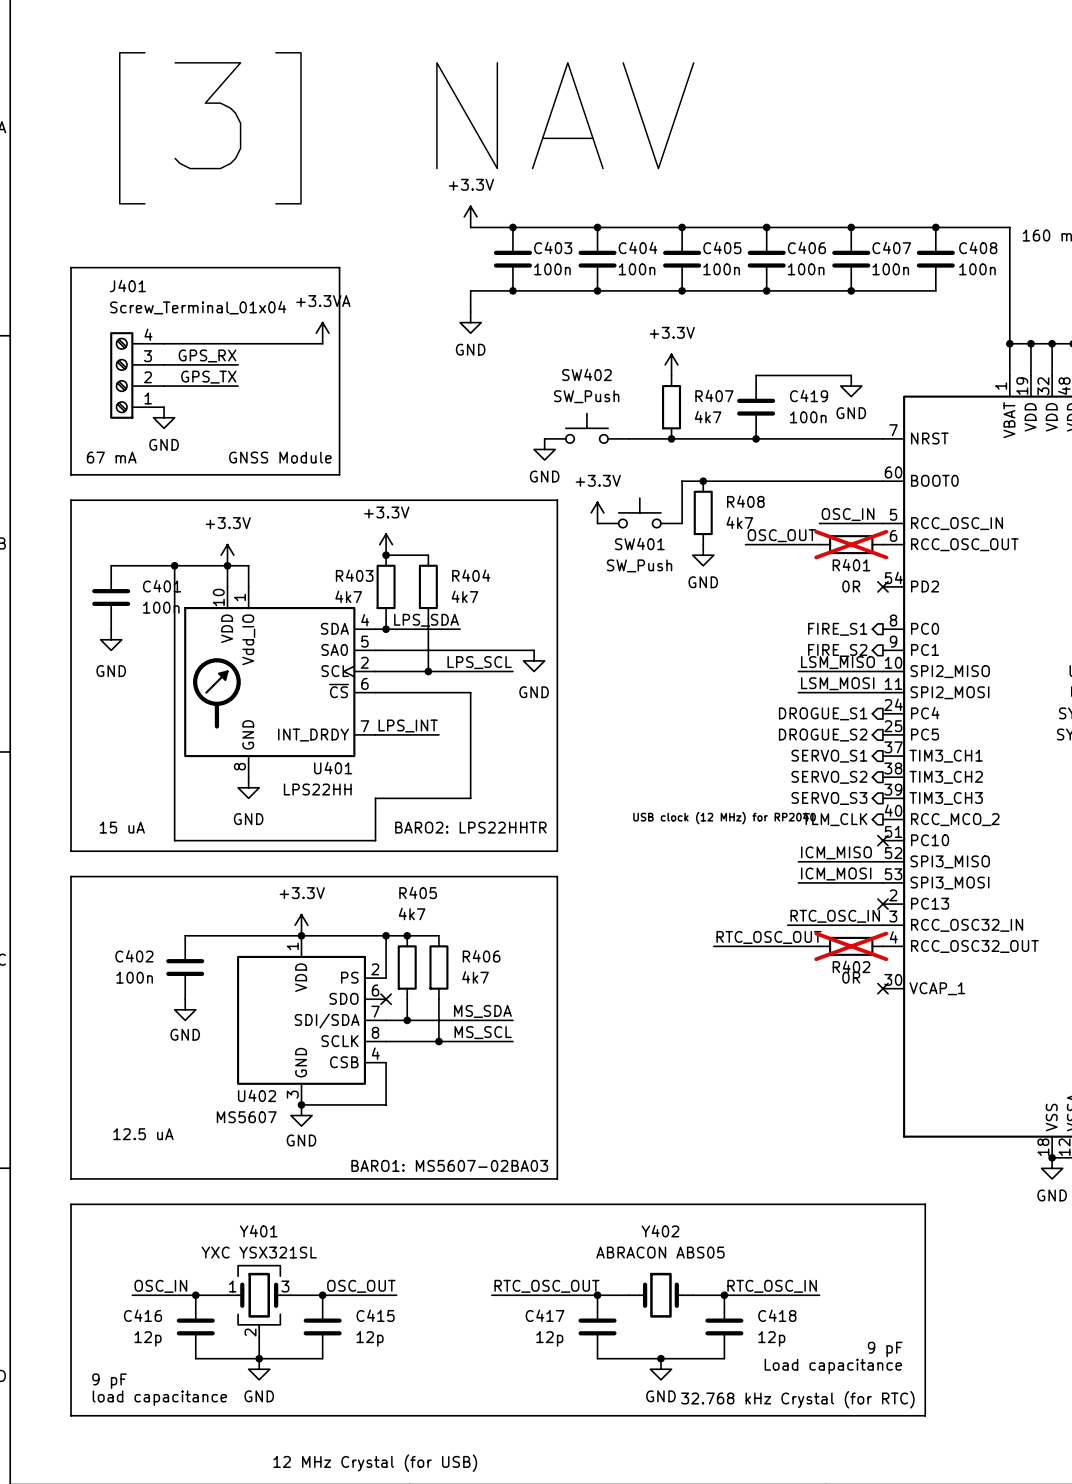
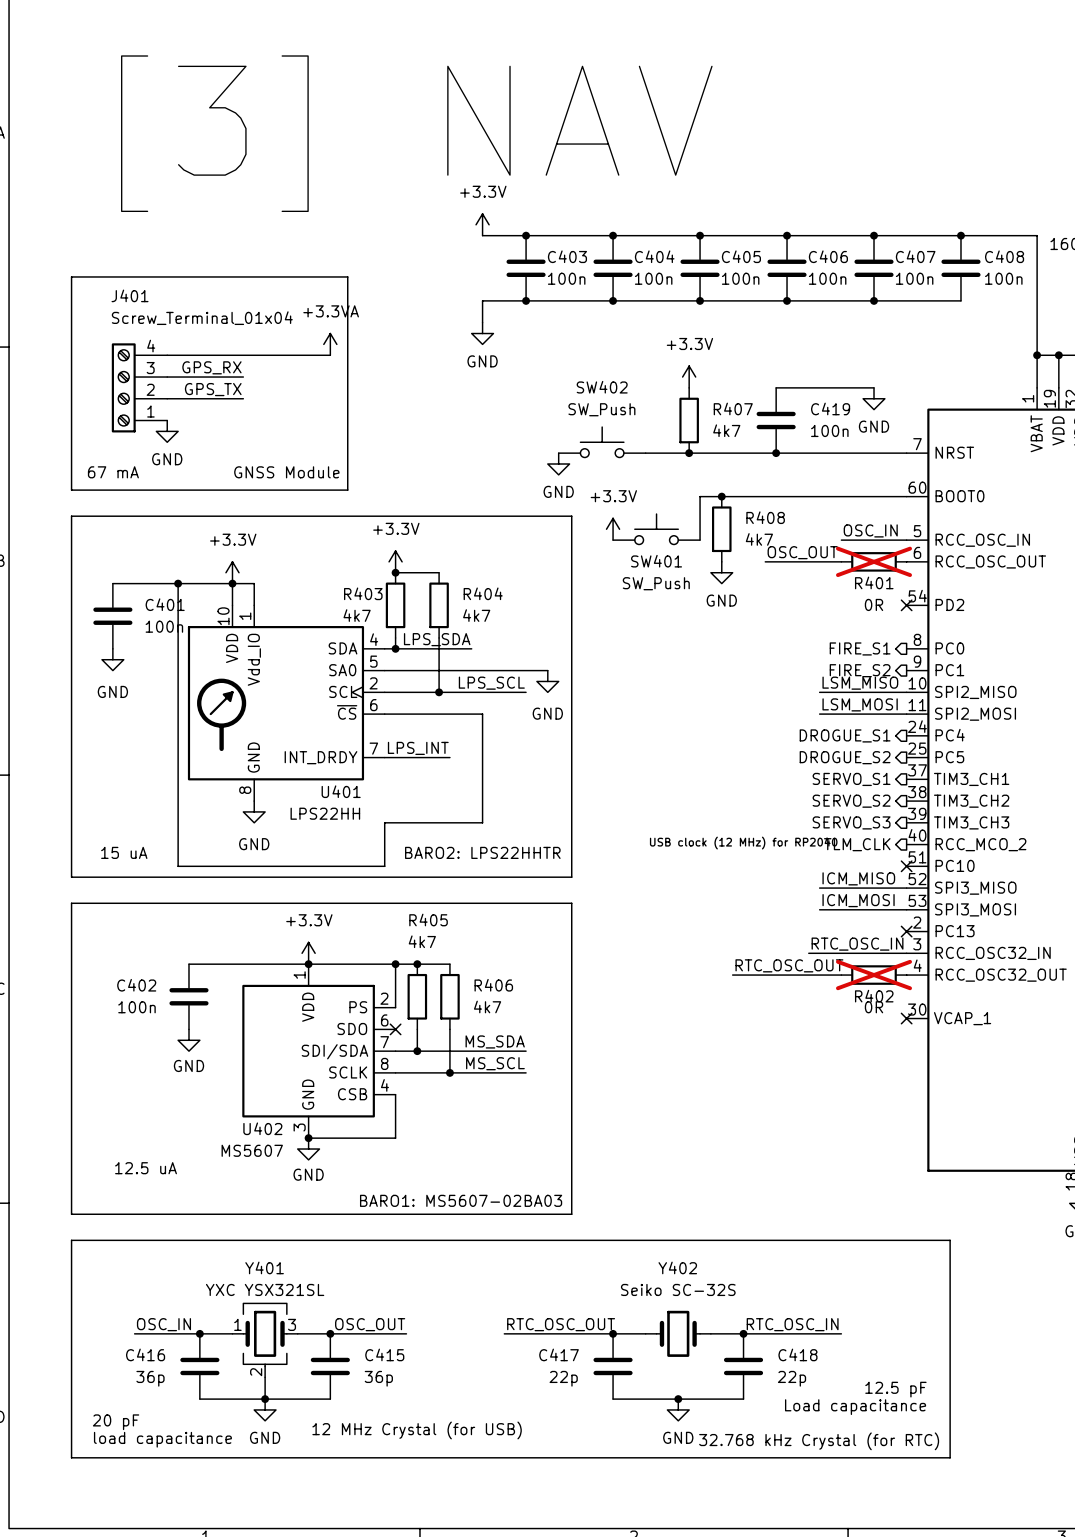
Y402 value: ABRACON ABS05 (660, 1252) -> Seiko SC-32S (678, 1289)
C416 value: 12p (148, 1338) -> 36p (150, 1378)
C415 value: 12p (370, 1338) -> 36p (378, 1378)
C417 value: 12p (549, 1338) -> 22p (563, 1378)
C418 value: 12p (771, 1338) -> 22p (792, 1378)
text: 9 pF (885, 1349) -> 12.5 pF (895, 1389)
text: 9 pF (109, 1381) -> 20 pF (116, 1422)
text position: 12 MHz Crystal (for USB) (375, 1463) -> 12 MHz Crystal (for USB) (417, 1430)

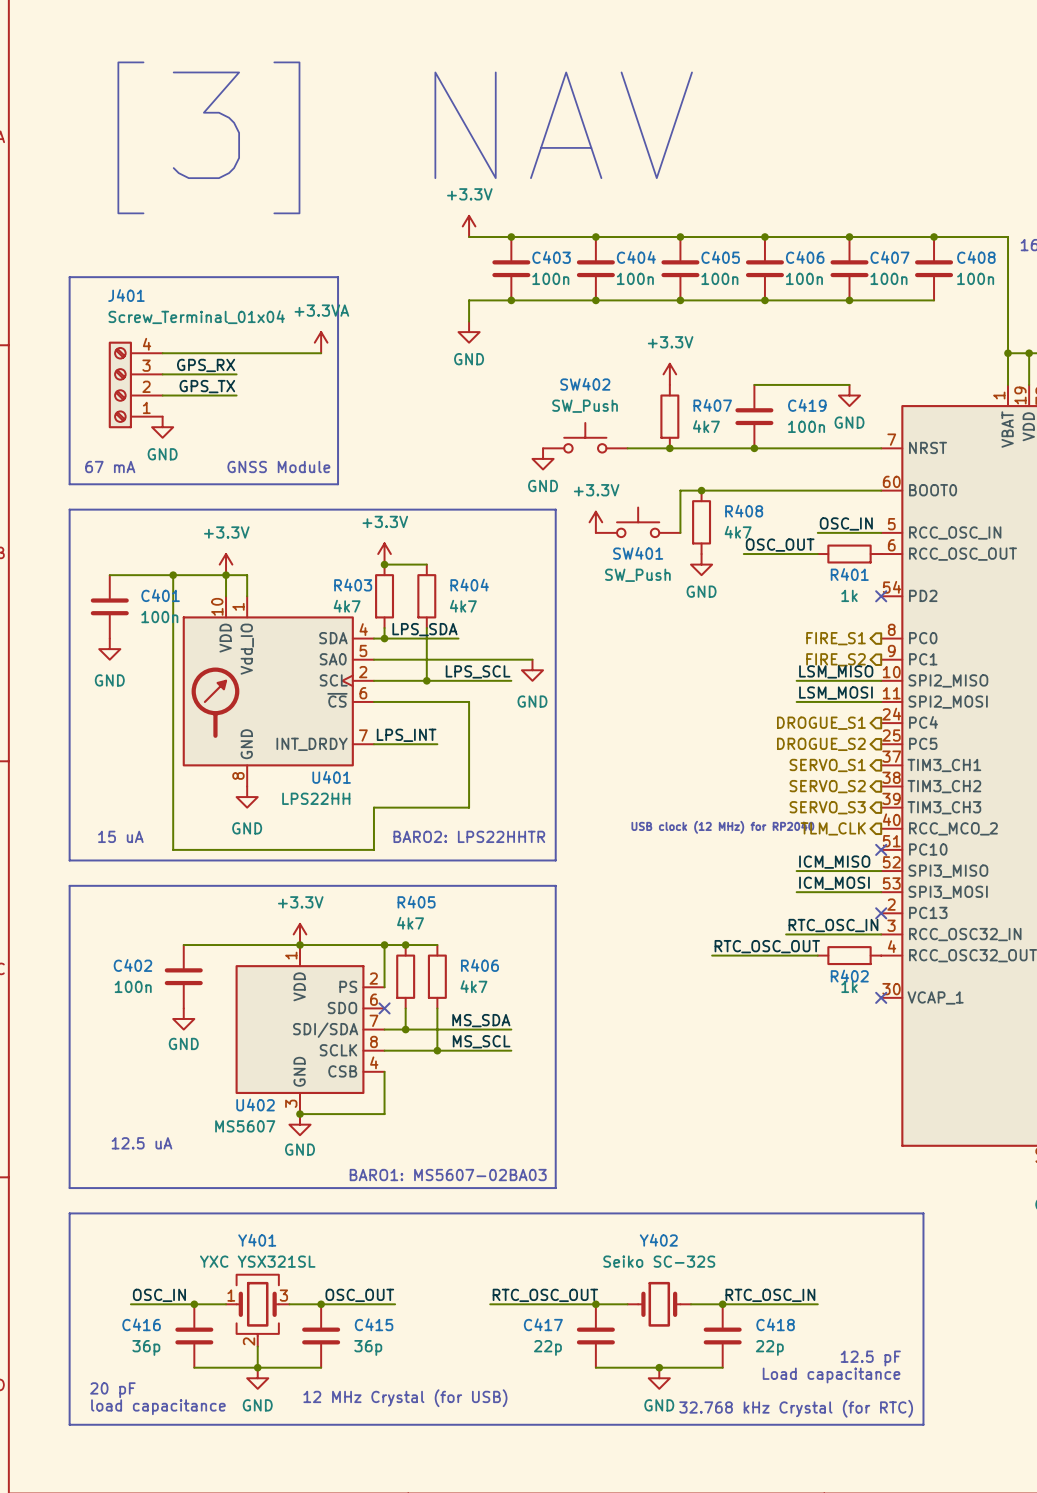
R401 do-not-place cross: (874, 561) -> none
R401 value: 0R (874, 604) -> 1k (849, 595)
R402 do-not-place cross: (874, 975) -> none
R402 value: 0R (874, 1007) -> 1k (849, 986)

